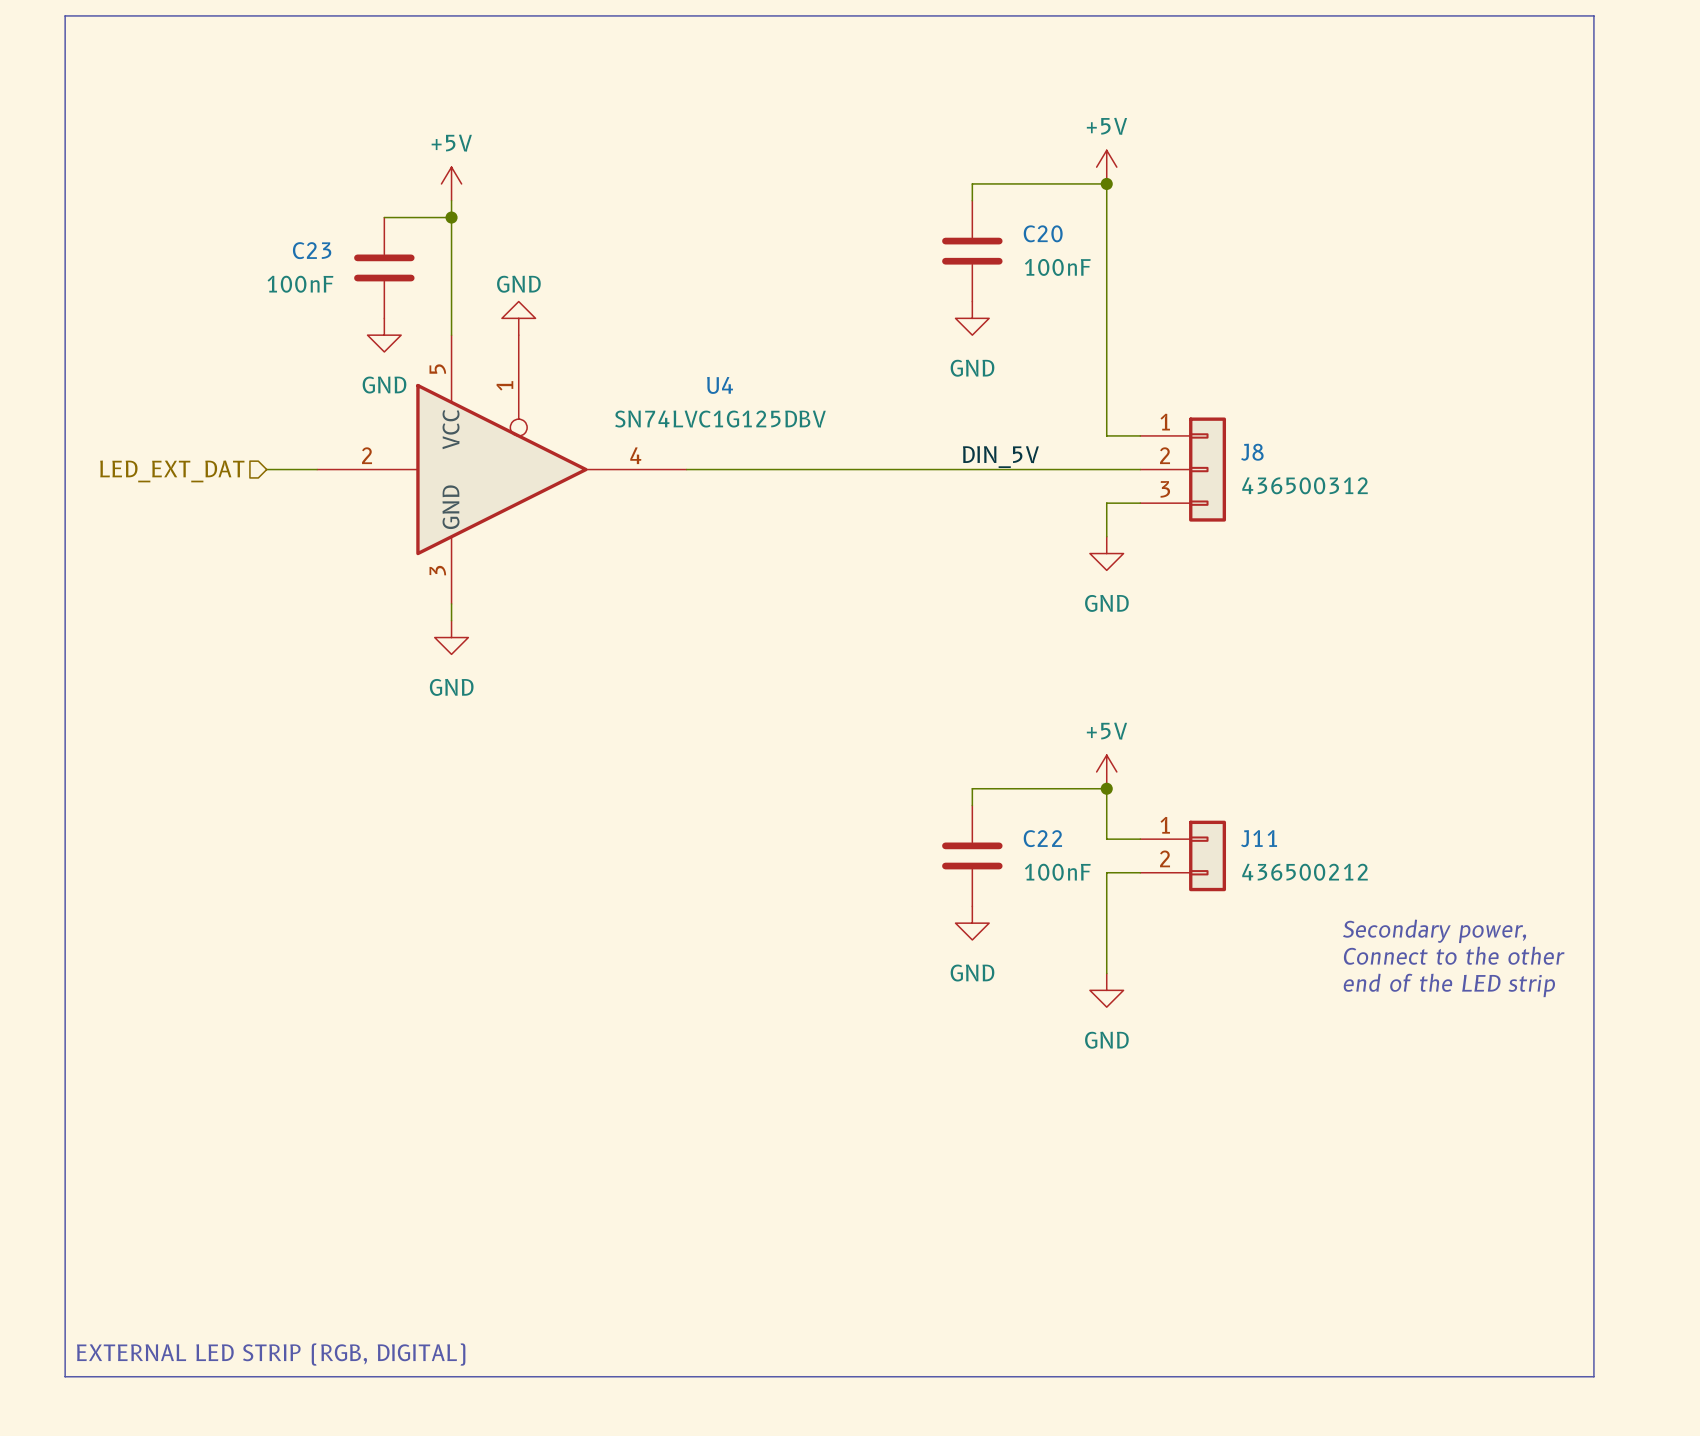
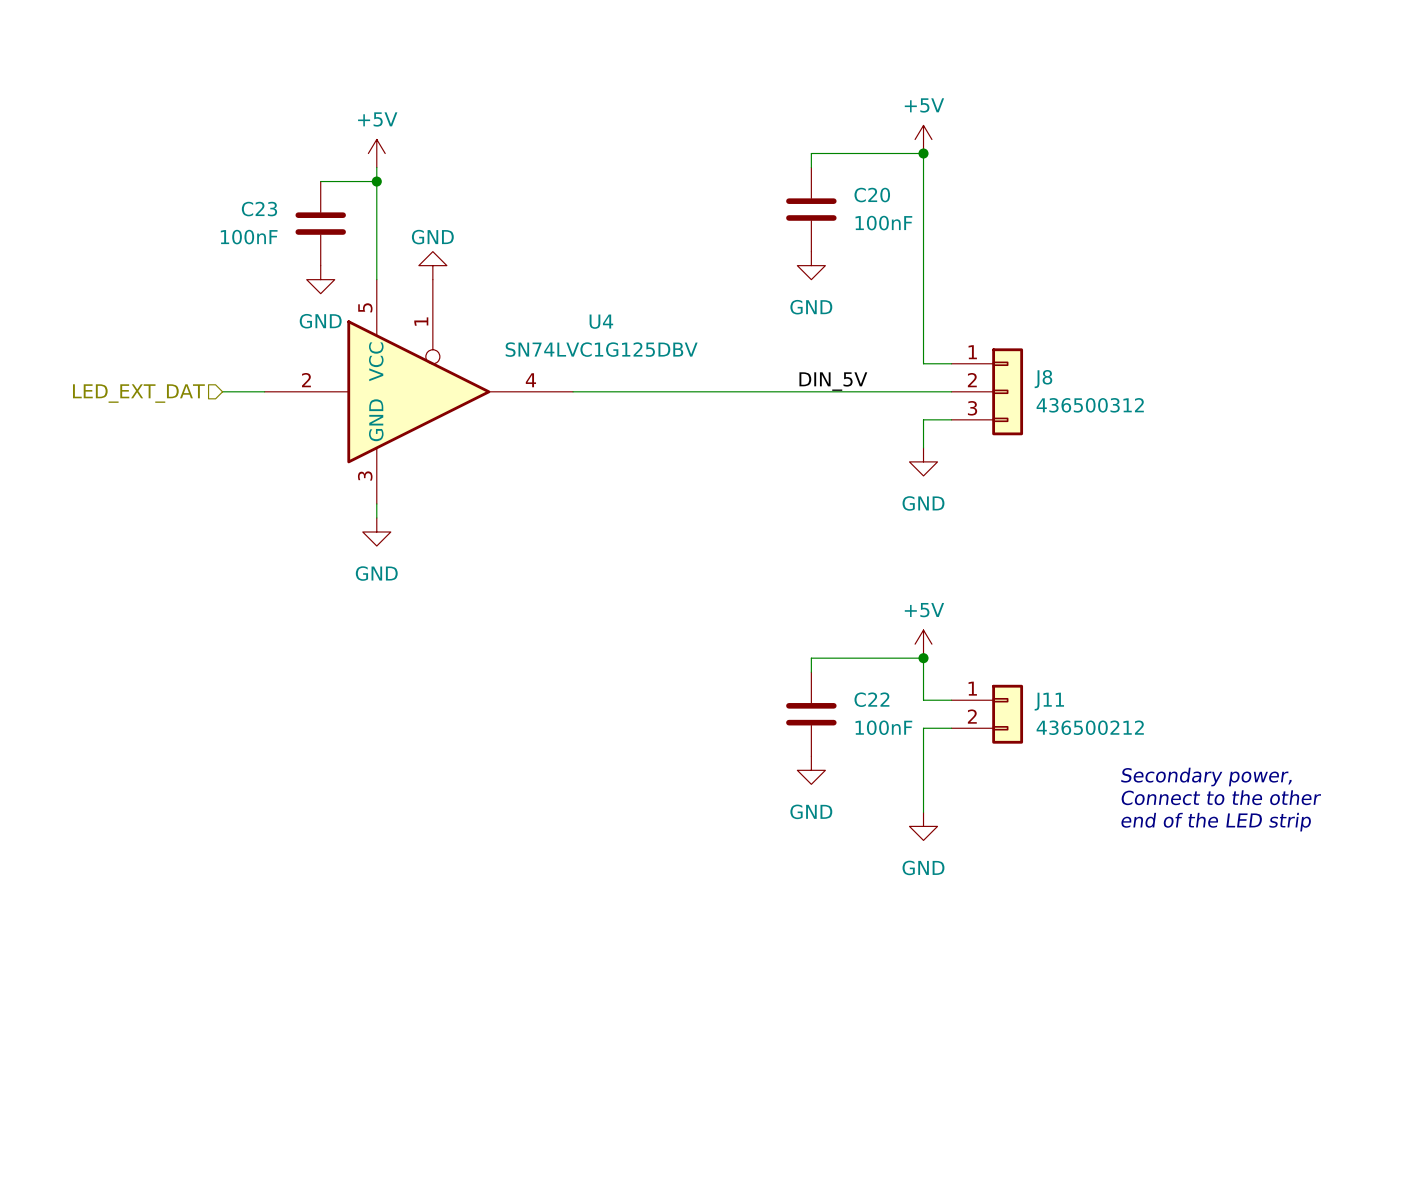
line: (65, 15) (1593, 15) (1593, 1376) (65, 1376) (65, 15) -> none
text: EXTERNAL LED STRIP (RGB, DIGITAL) (271, 1354) -> none

